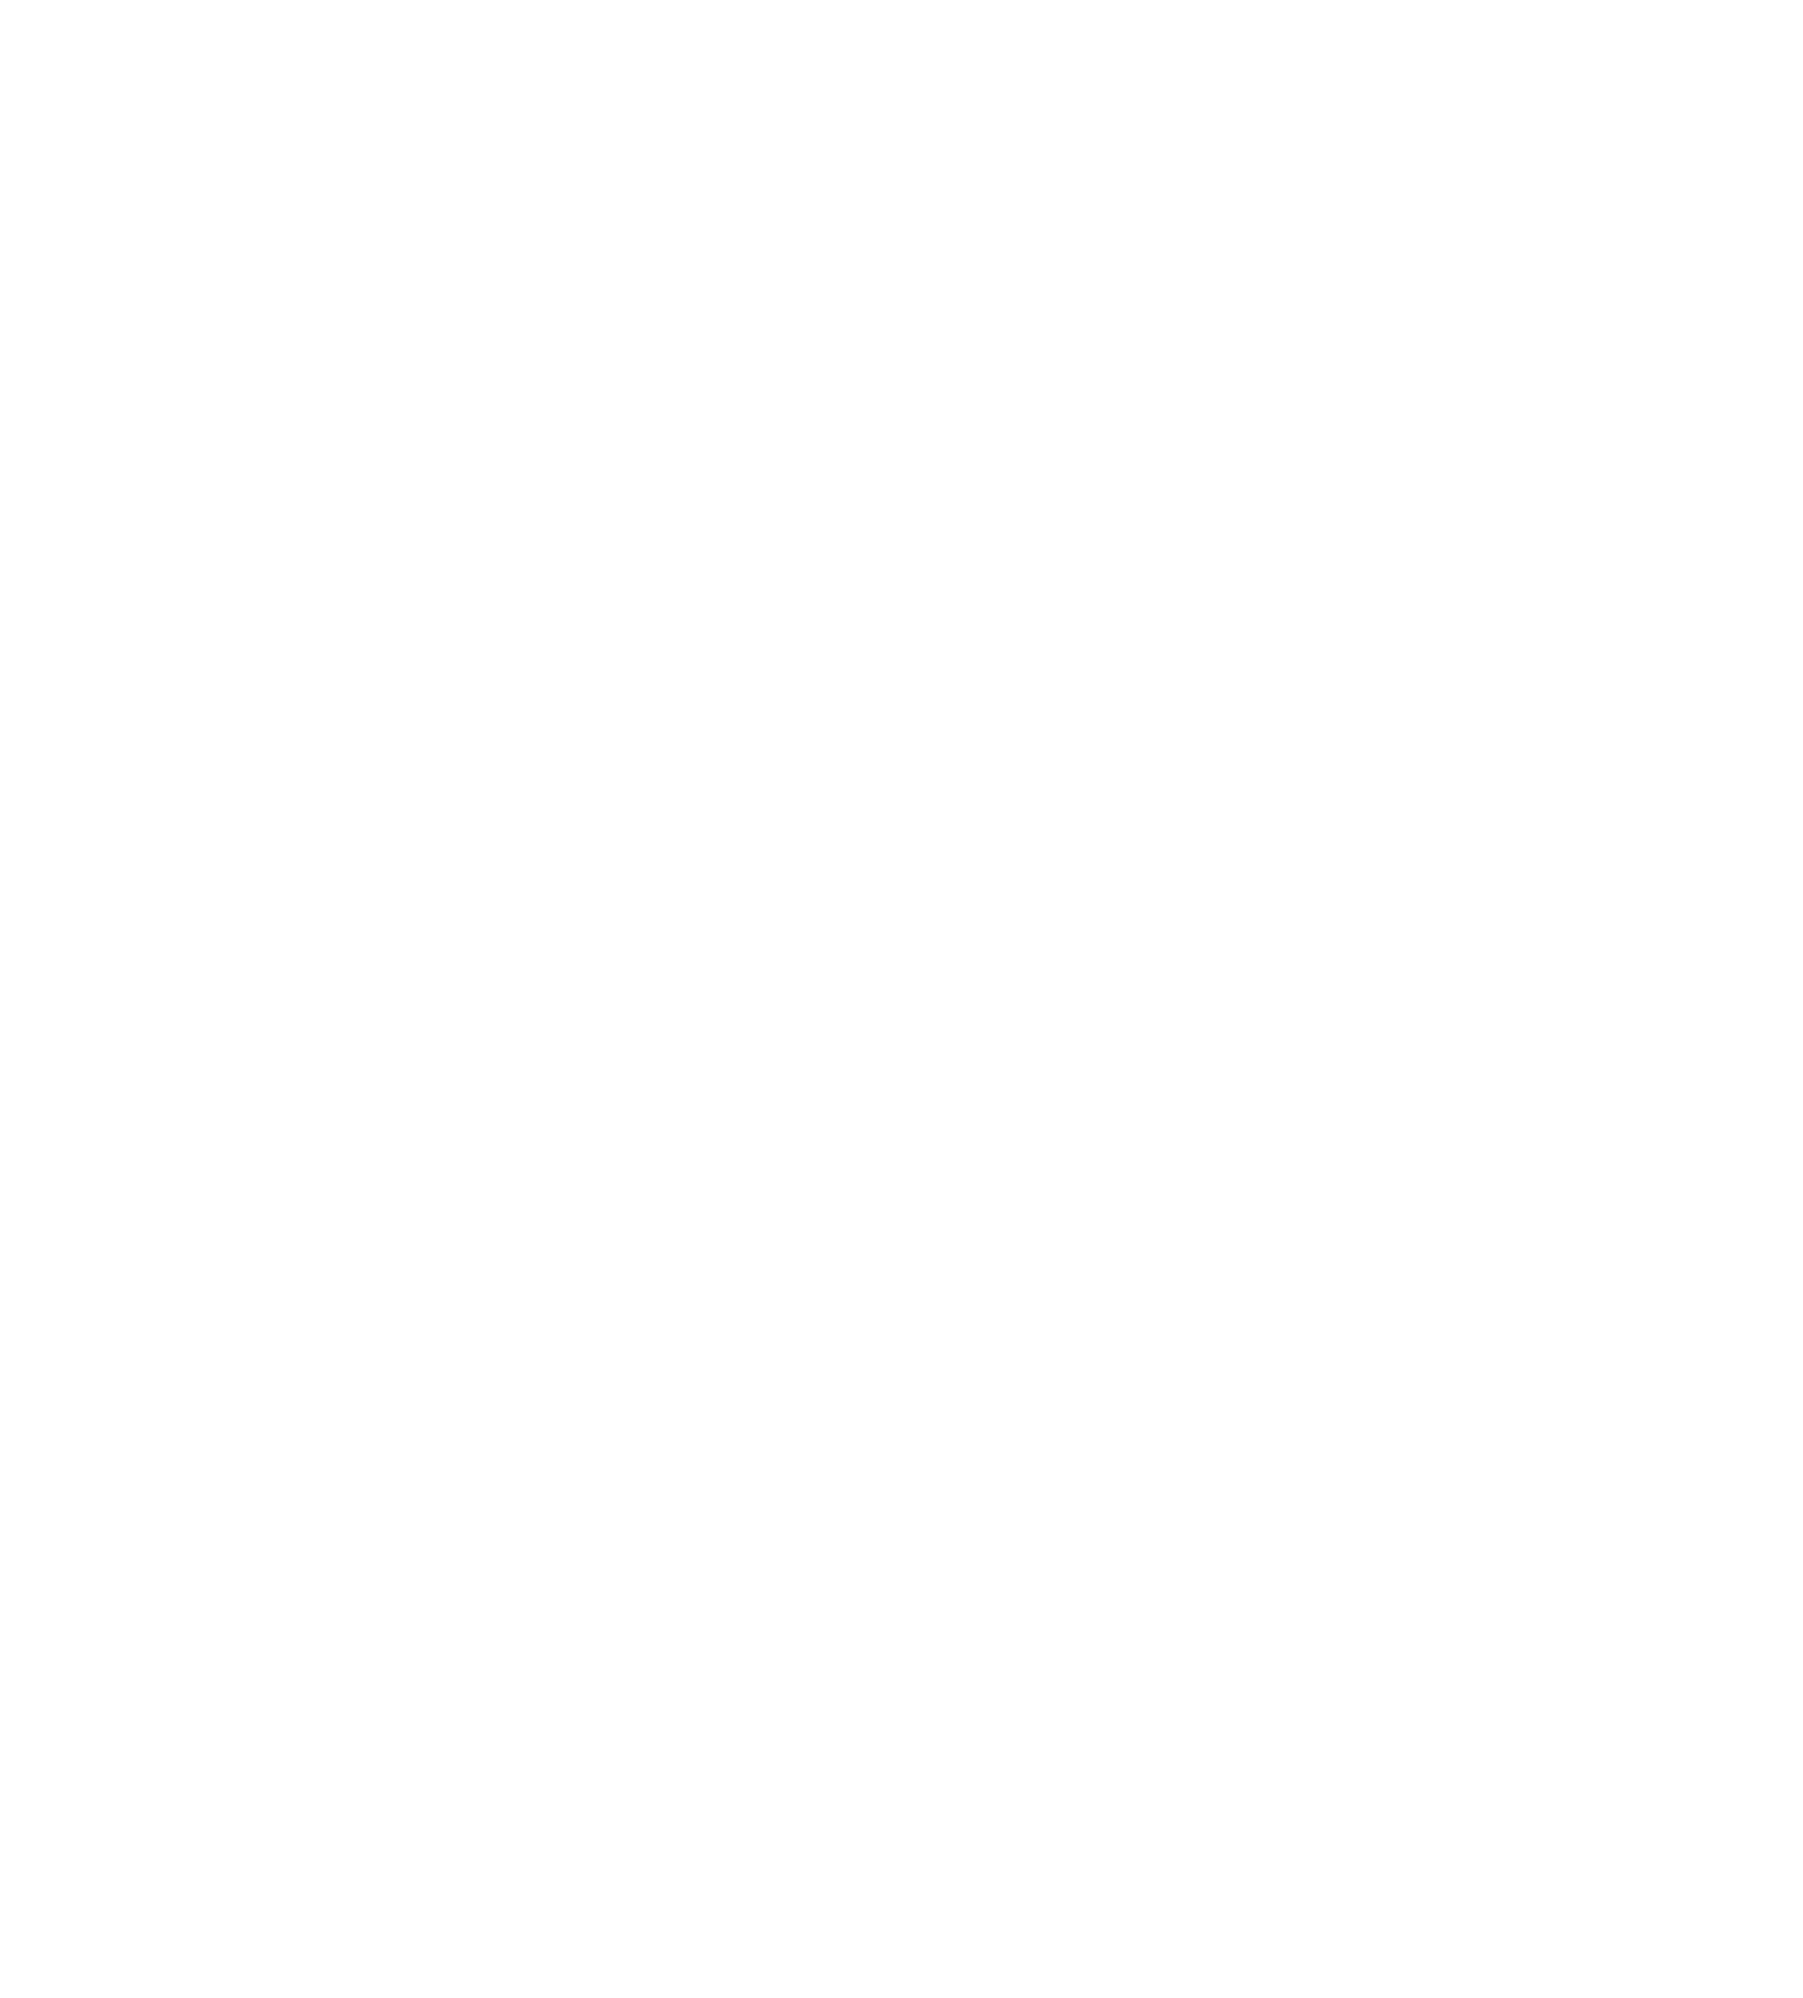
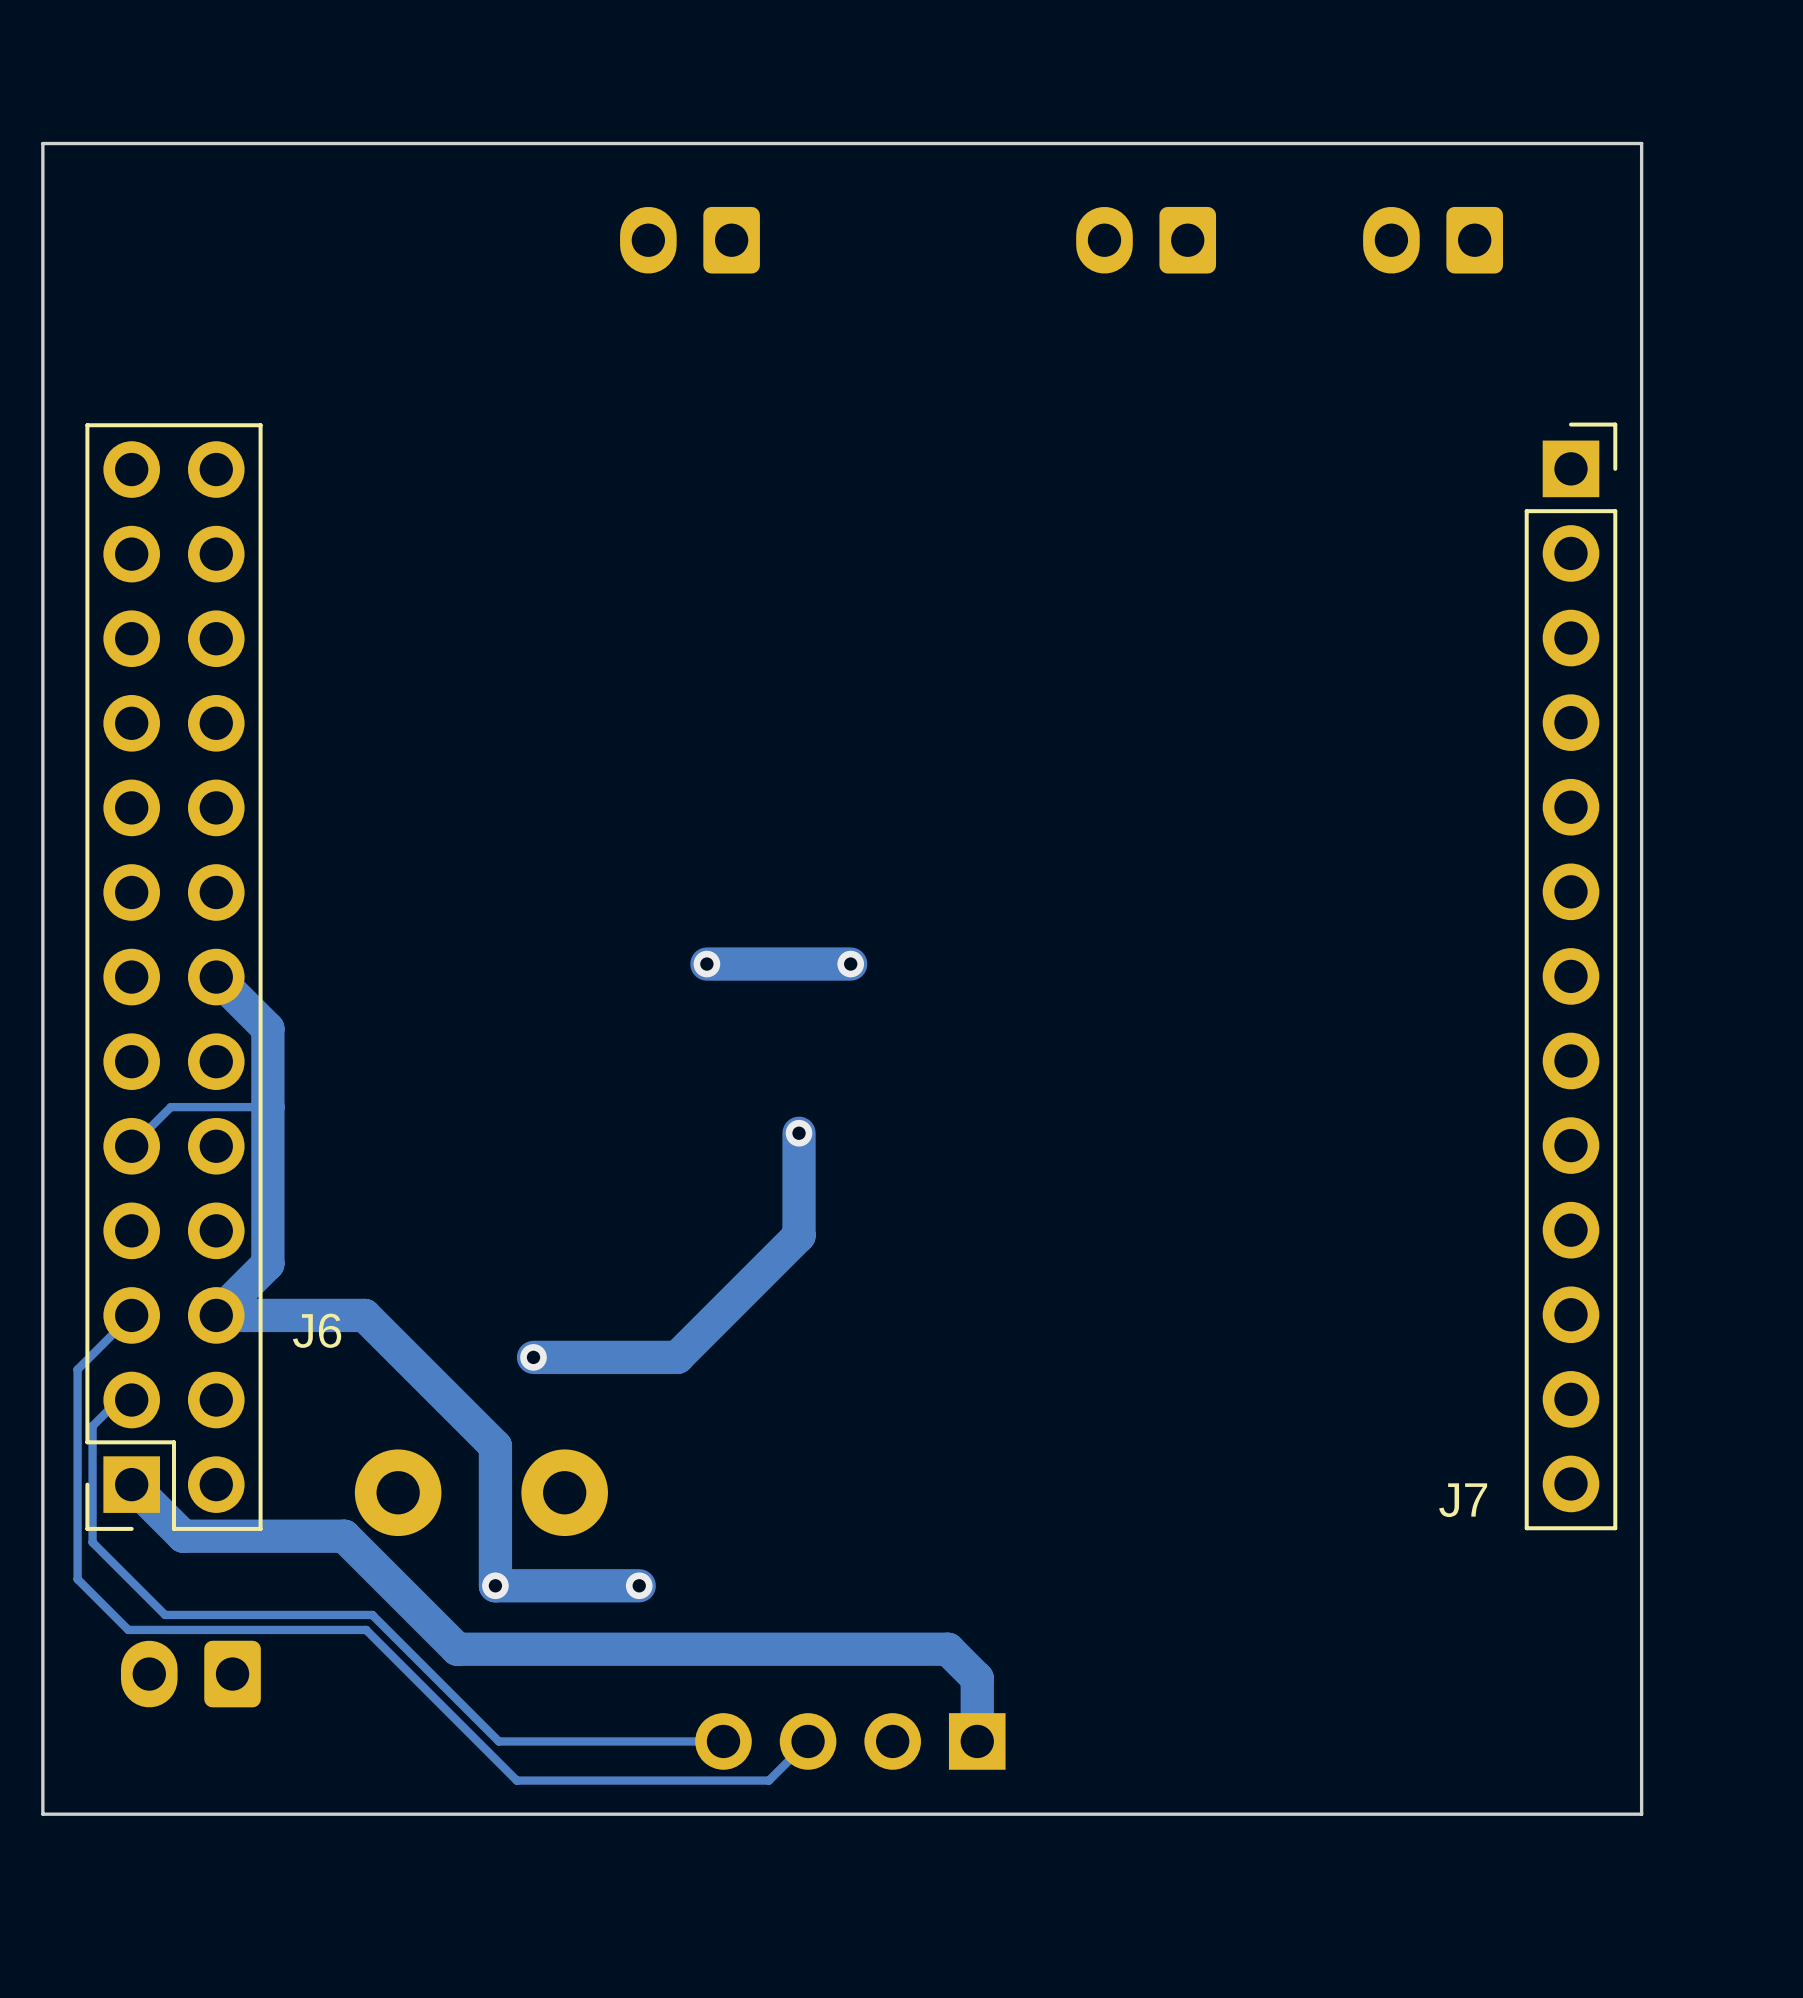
board edge: none -> (1641, 143) (42, 143) (42, 1814) (1641, 1814) (1641, 143)
part: none -> (689, 240)
part: none -> (1146, 240)
part: none -> (1433, 240)
via: none -> (706, 964)
track: none -> (850, 964) (706, 964)
via: none -> (850, 964)
J7: none -> (1570, 976)
J6: none -> (173, 977)
track: none -> (216, 977) (267, 1028) (267, 1263) (216, 1315) (364, 1315) (495, 1446) (495, 1585) (639, 1585)
track: none -> (267, 1107) (170, 1107) (131, 1146)
track: none -> (799, 1133) (799, 1235) (677, 1357) (533, 1357)
via: none -> (799, 1133)
track: none -> (131, 1315) (77, 1369) (77, 1579) (128, 1629) (366, 1629) (516, 1780) (768, 1780) (808, 1741)
via: none -> (533, 1357)
track: none -> (131, 1400) (118, 1400) (92, 1426) (92, 1542) (165, 1614) (372, 1614) (498, 1741) (723, 1741)
track: none -> (131, 1484) (183, 1536) (344, 1536) (457, 1649) (947, 1649) (977, 1678) (977, 1741)
part: none -> (481, 1492)
via: none -> (495, 1585)
via: none -> (639, 1585)
part: none -> (190, 1674)
part: none -> (850, 1741)

